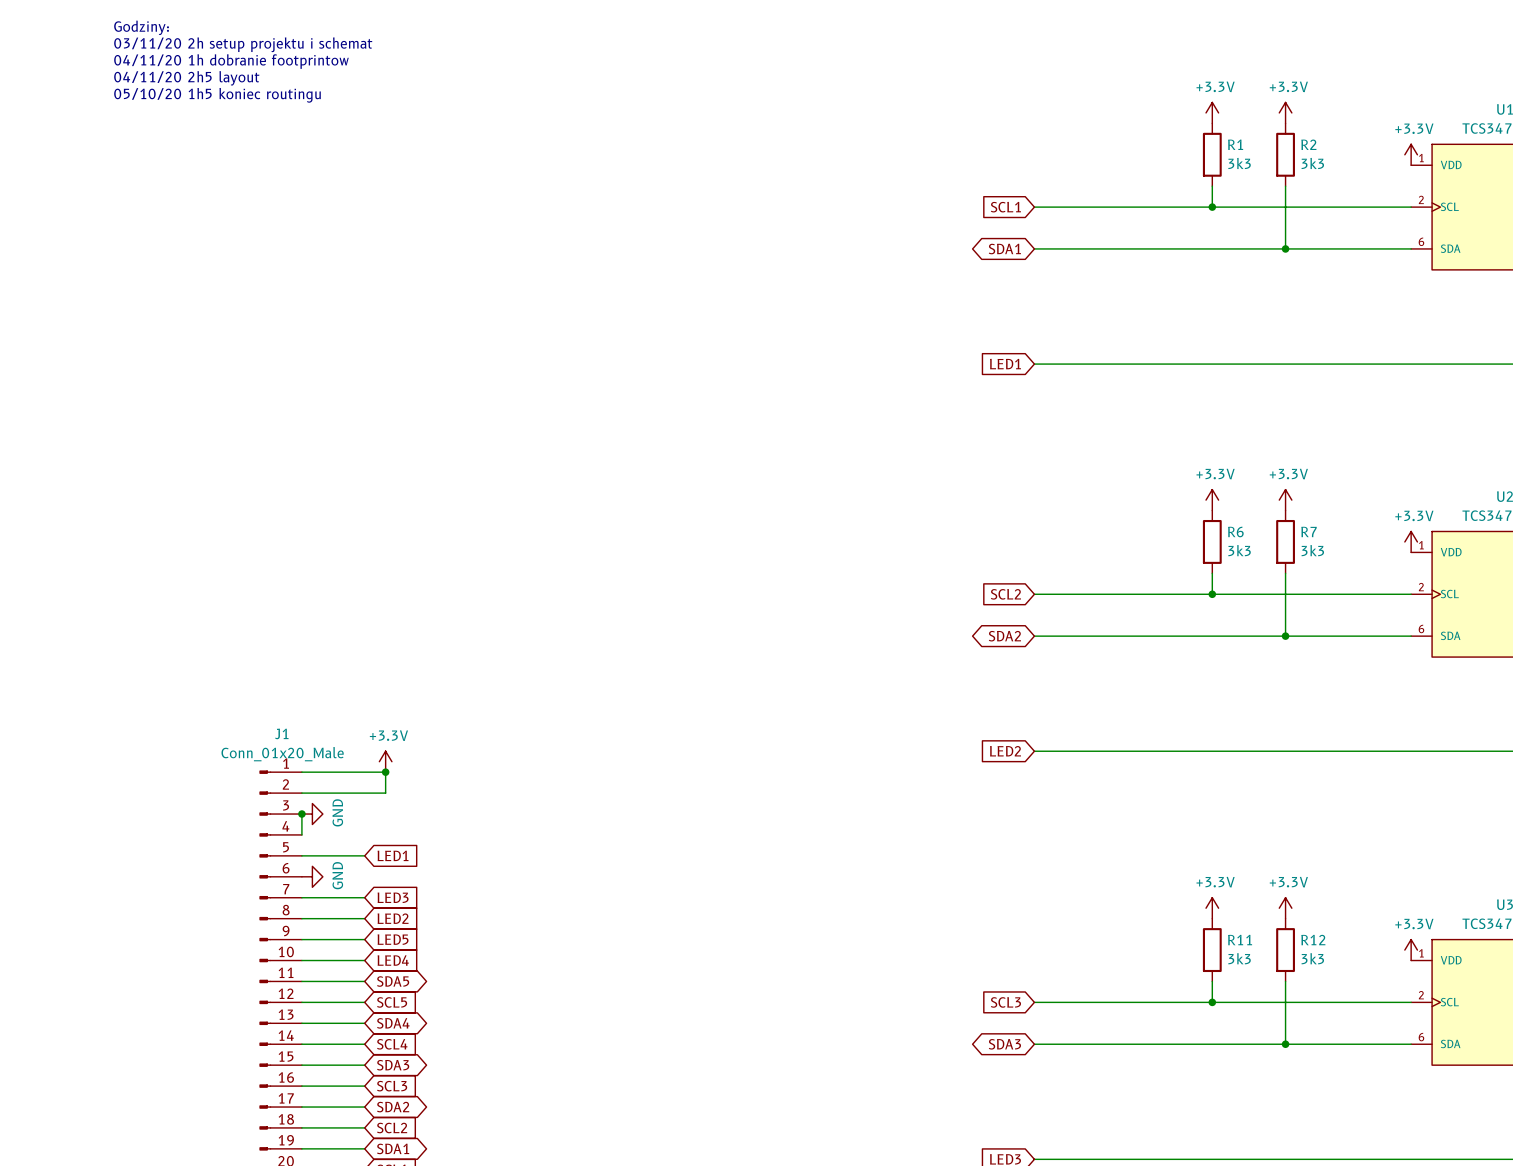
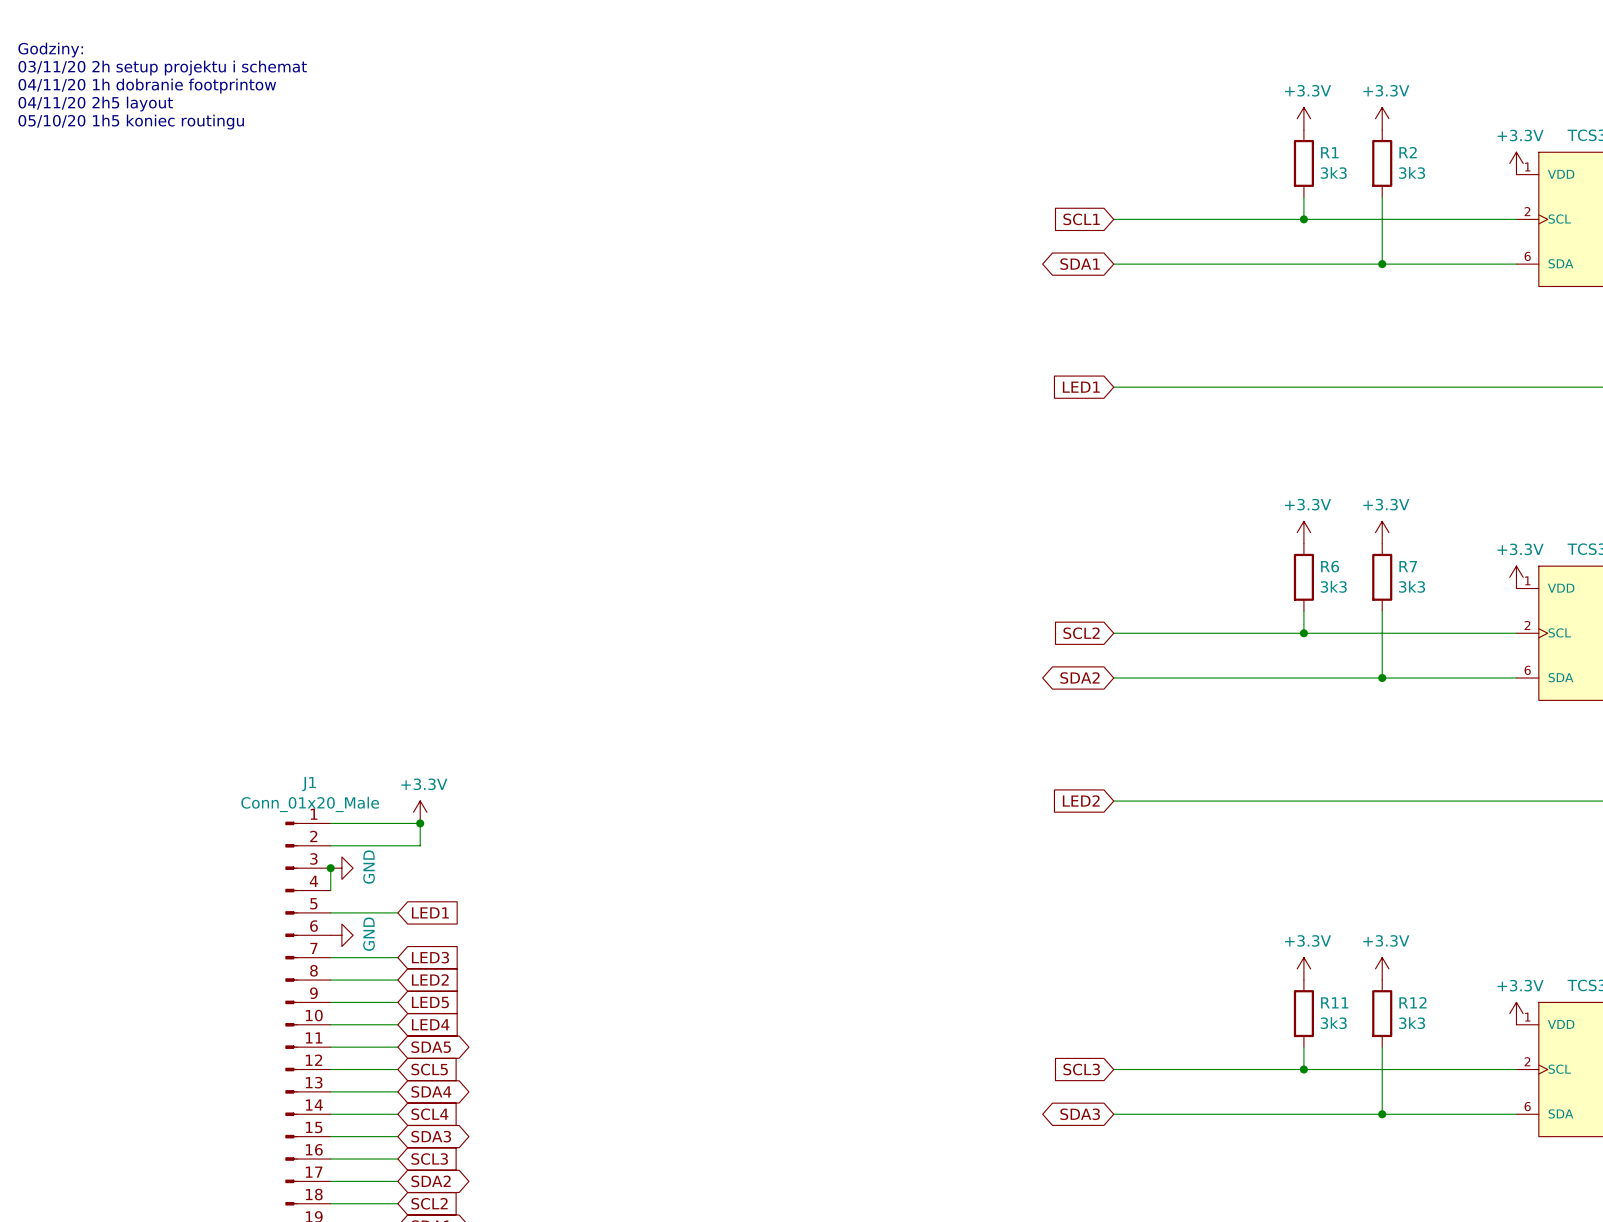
text position: Godziny: (141, 27) -> Godziny: (50, 50)
text position: 03/11/20 2h setup projektu i schemat (243, 44) -> 03/11/20 2h setup projektu i schemat (162, 68)
text position: 04/11/20 1h dobranie footprintow (231, 61) -> 04/11/20 1h dobranie footprintow (147, 86)
text position: 04/11/20 2h5 layout (186, 78) -> 04/11/20 2h5 layout (95, 104)
text position: 05/10/20 1h5 koniec routingu (217, 95) -> 05/10/20 1h5 koniec routingu (131, 122)

